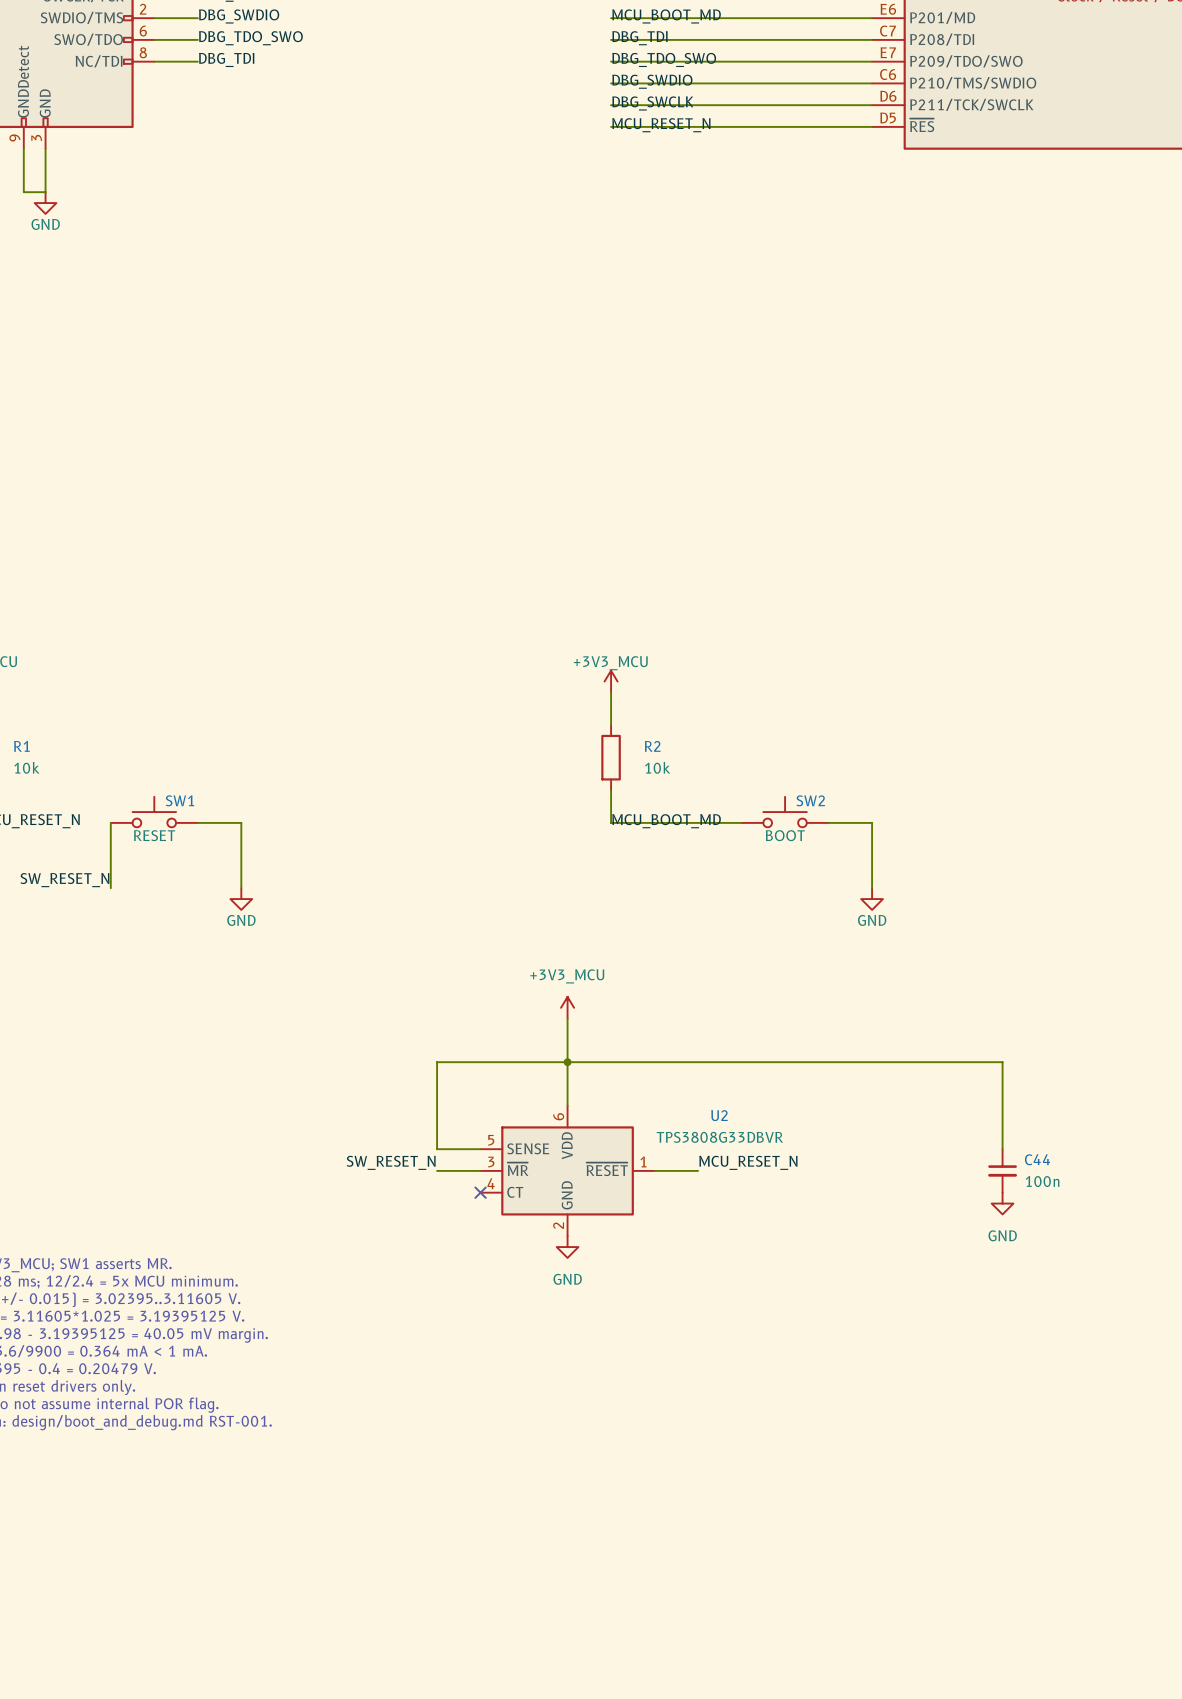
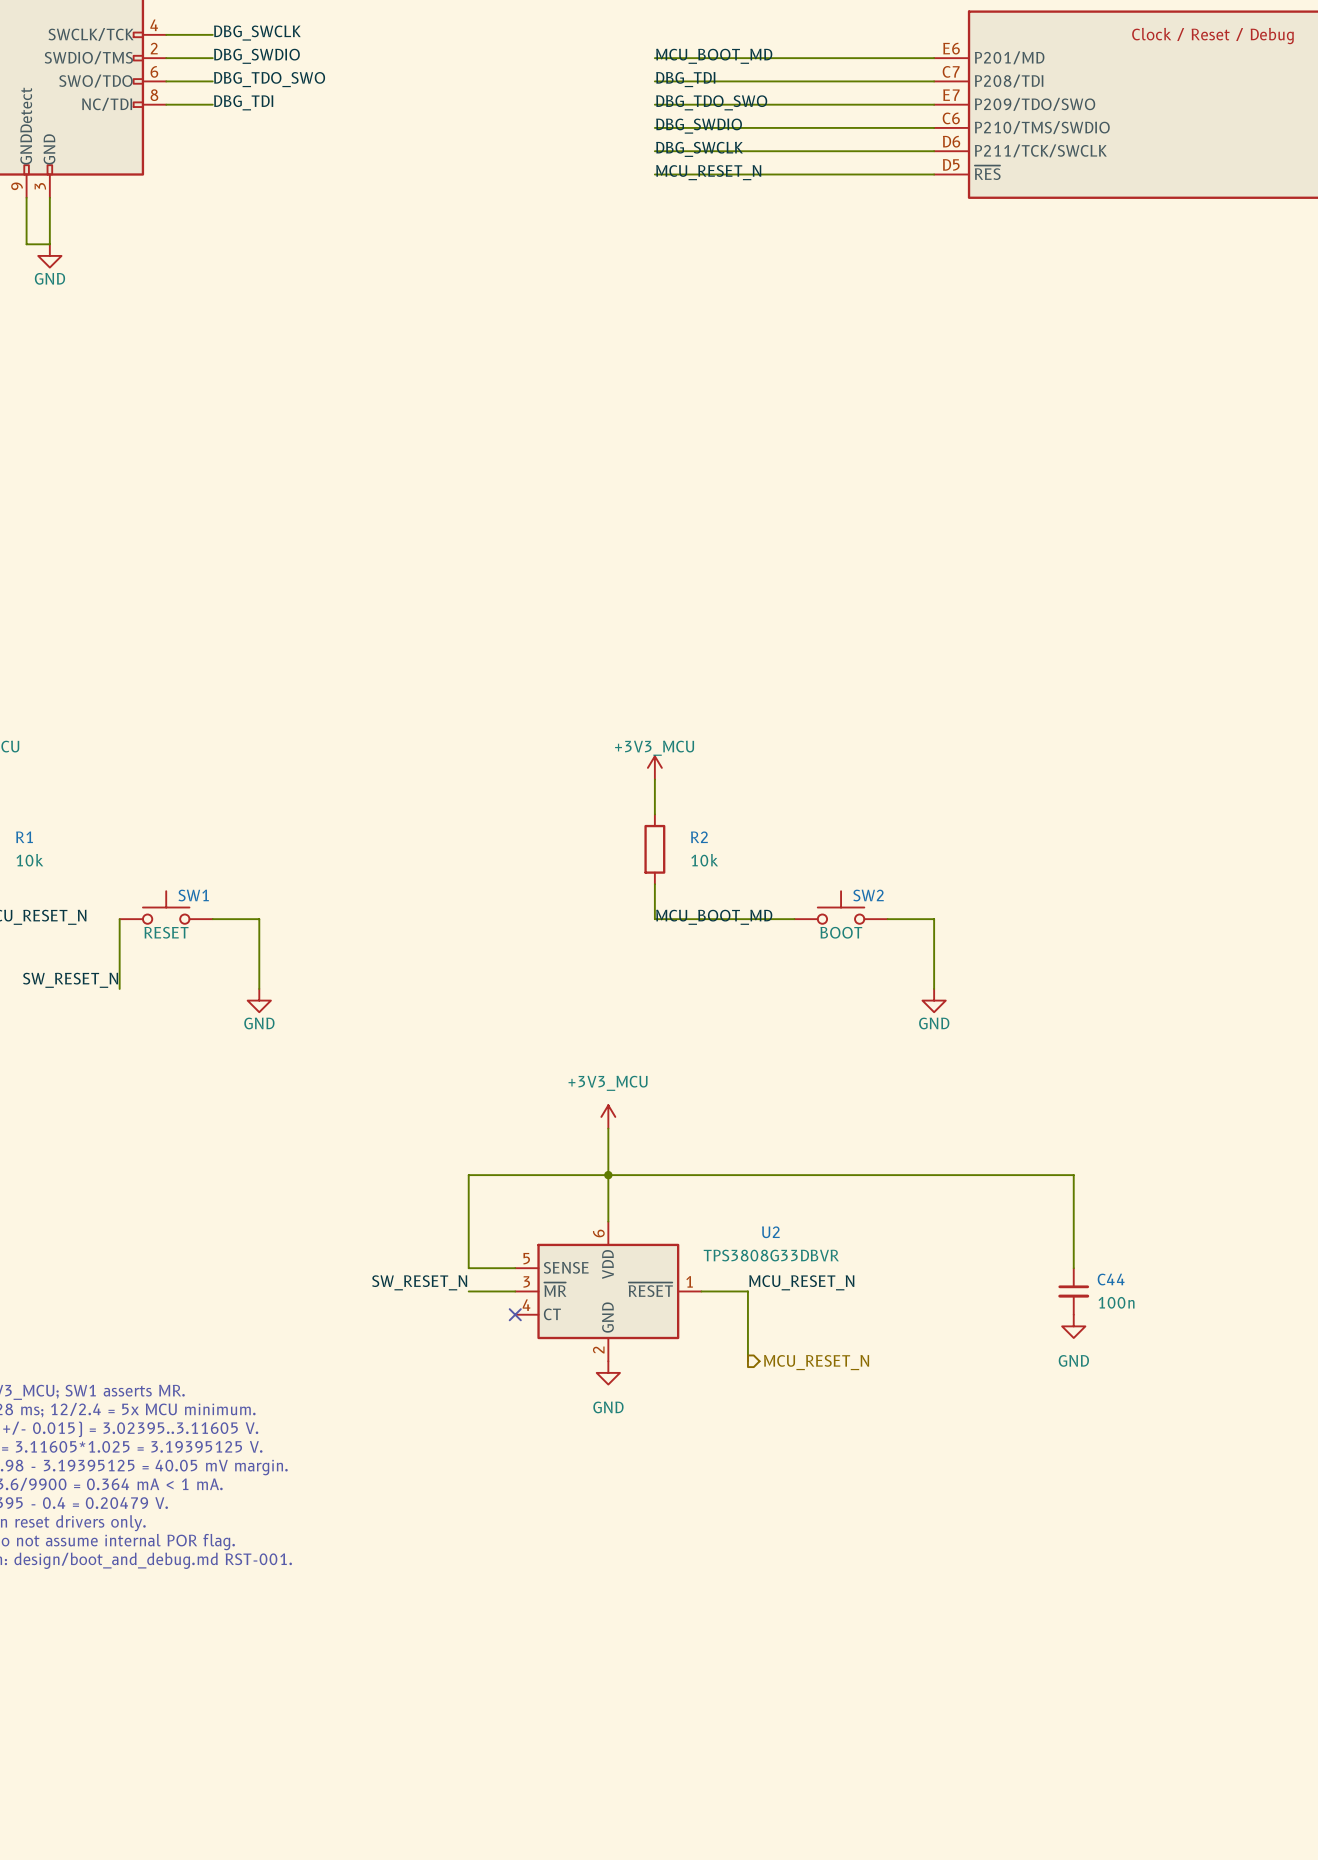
wire: none -> (747, 1291) (747, 1361)
hierarchical label: none -> MCU_RESET_N (816, 1362)

